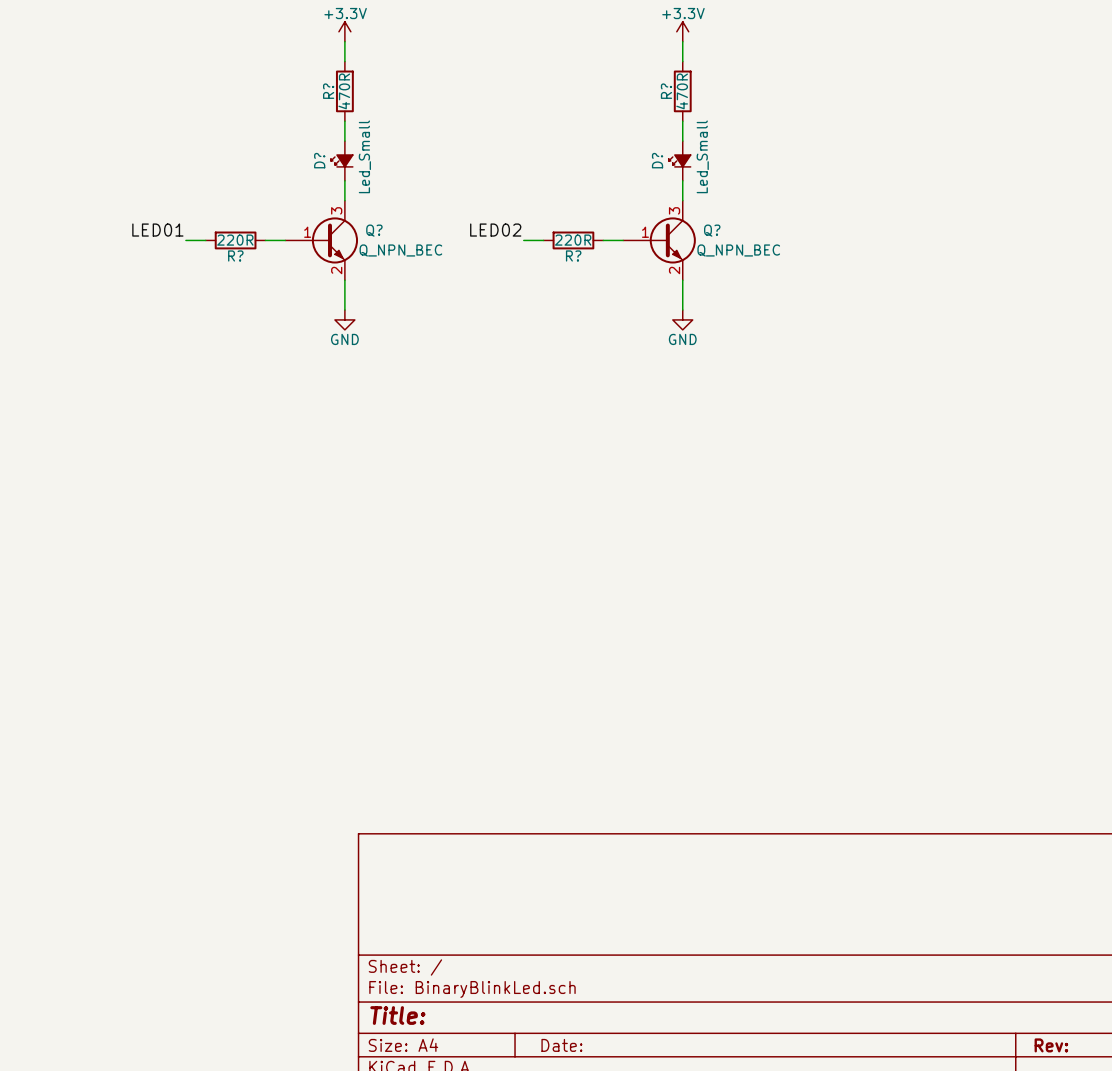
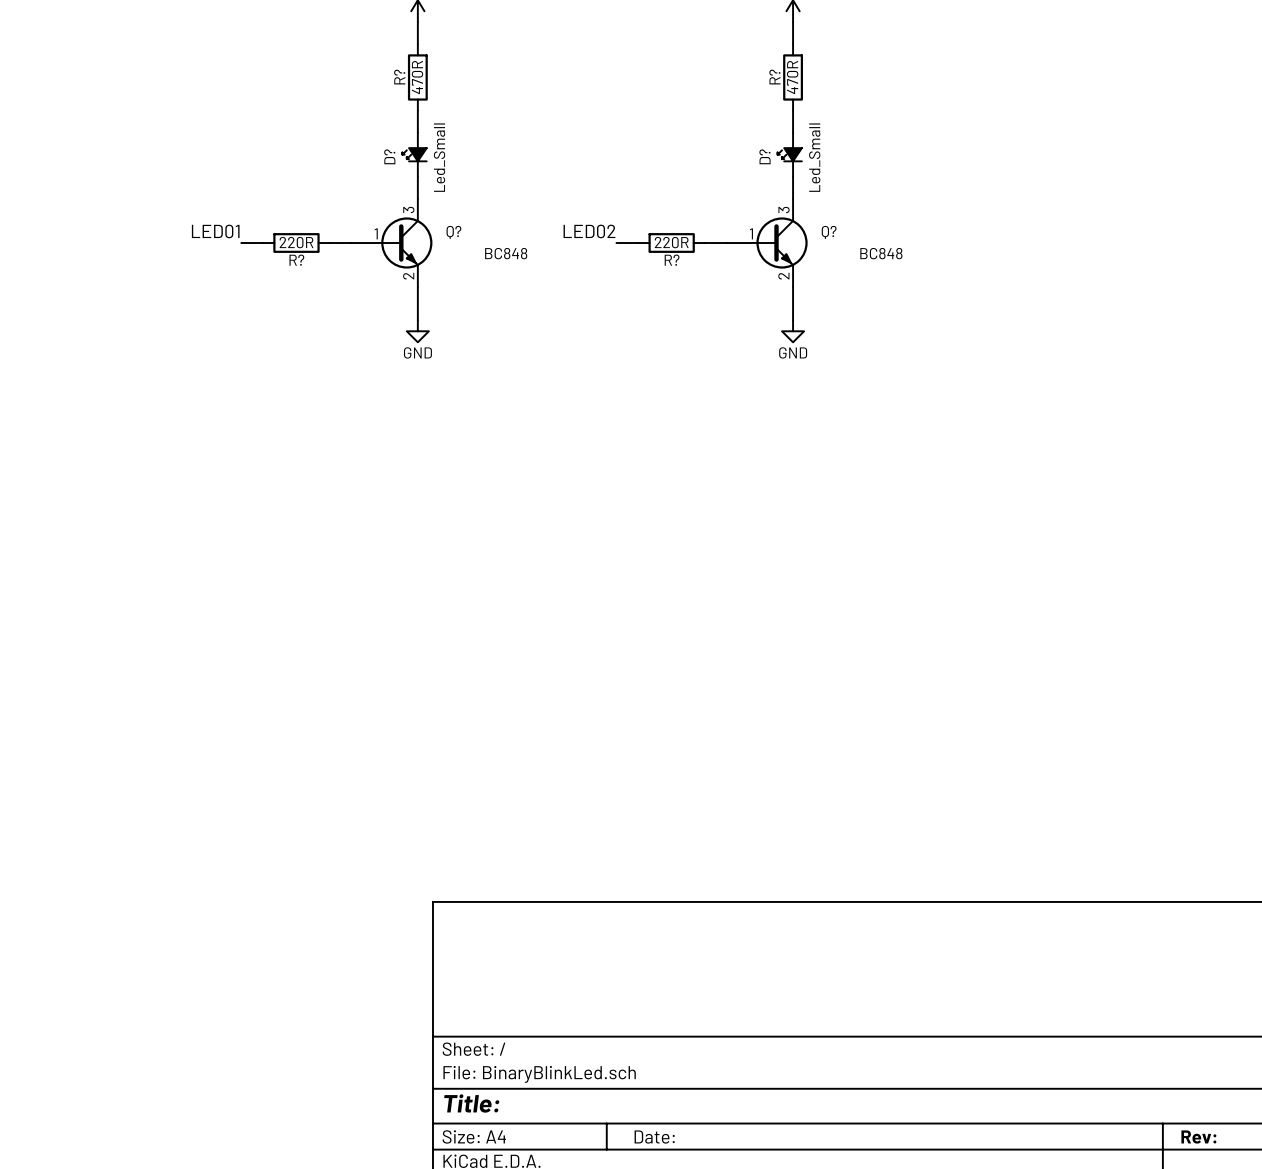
Q? value: Q_NPN_BEC (400, 250) -> BC848 (506, 253)
Q? value: Q_NPN_BEC (738, 250) -> BC848 (881, 253)

